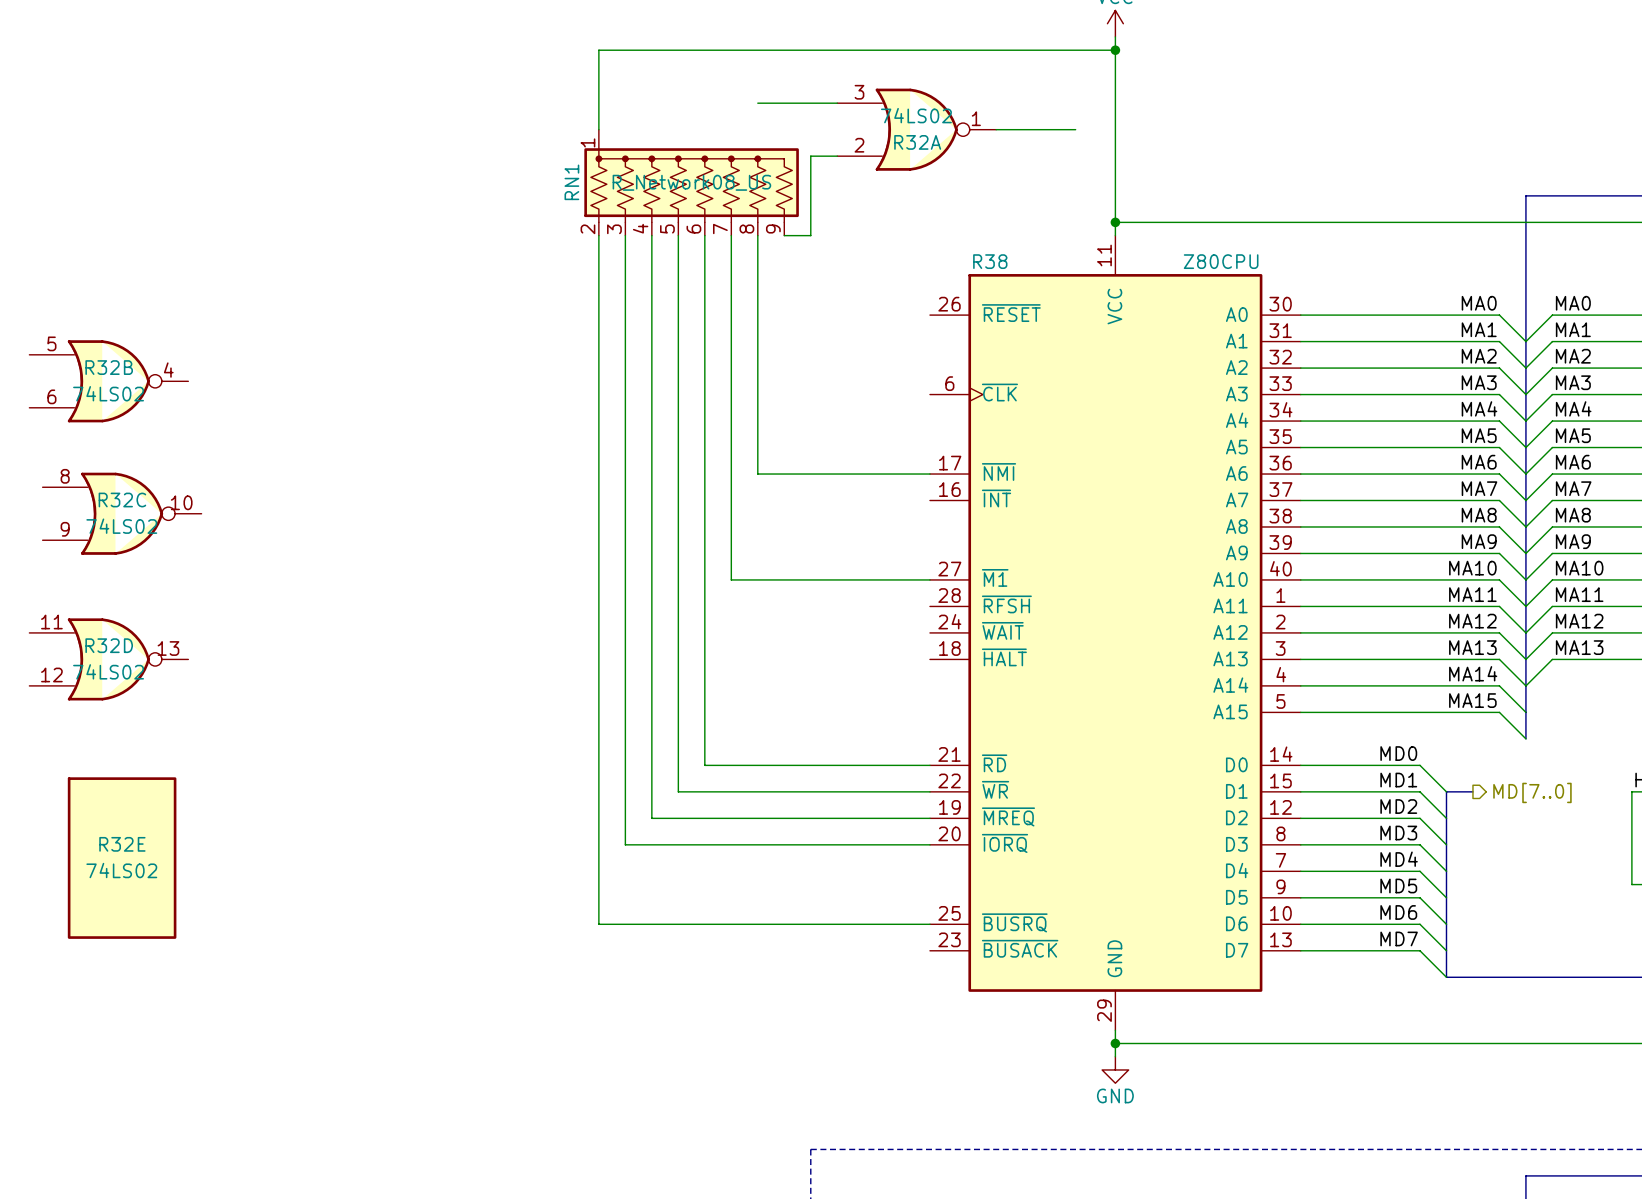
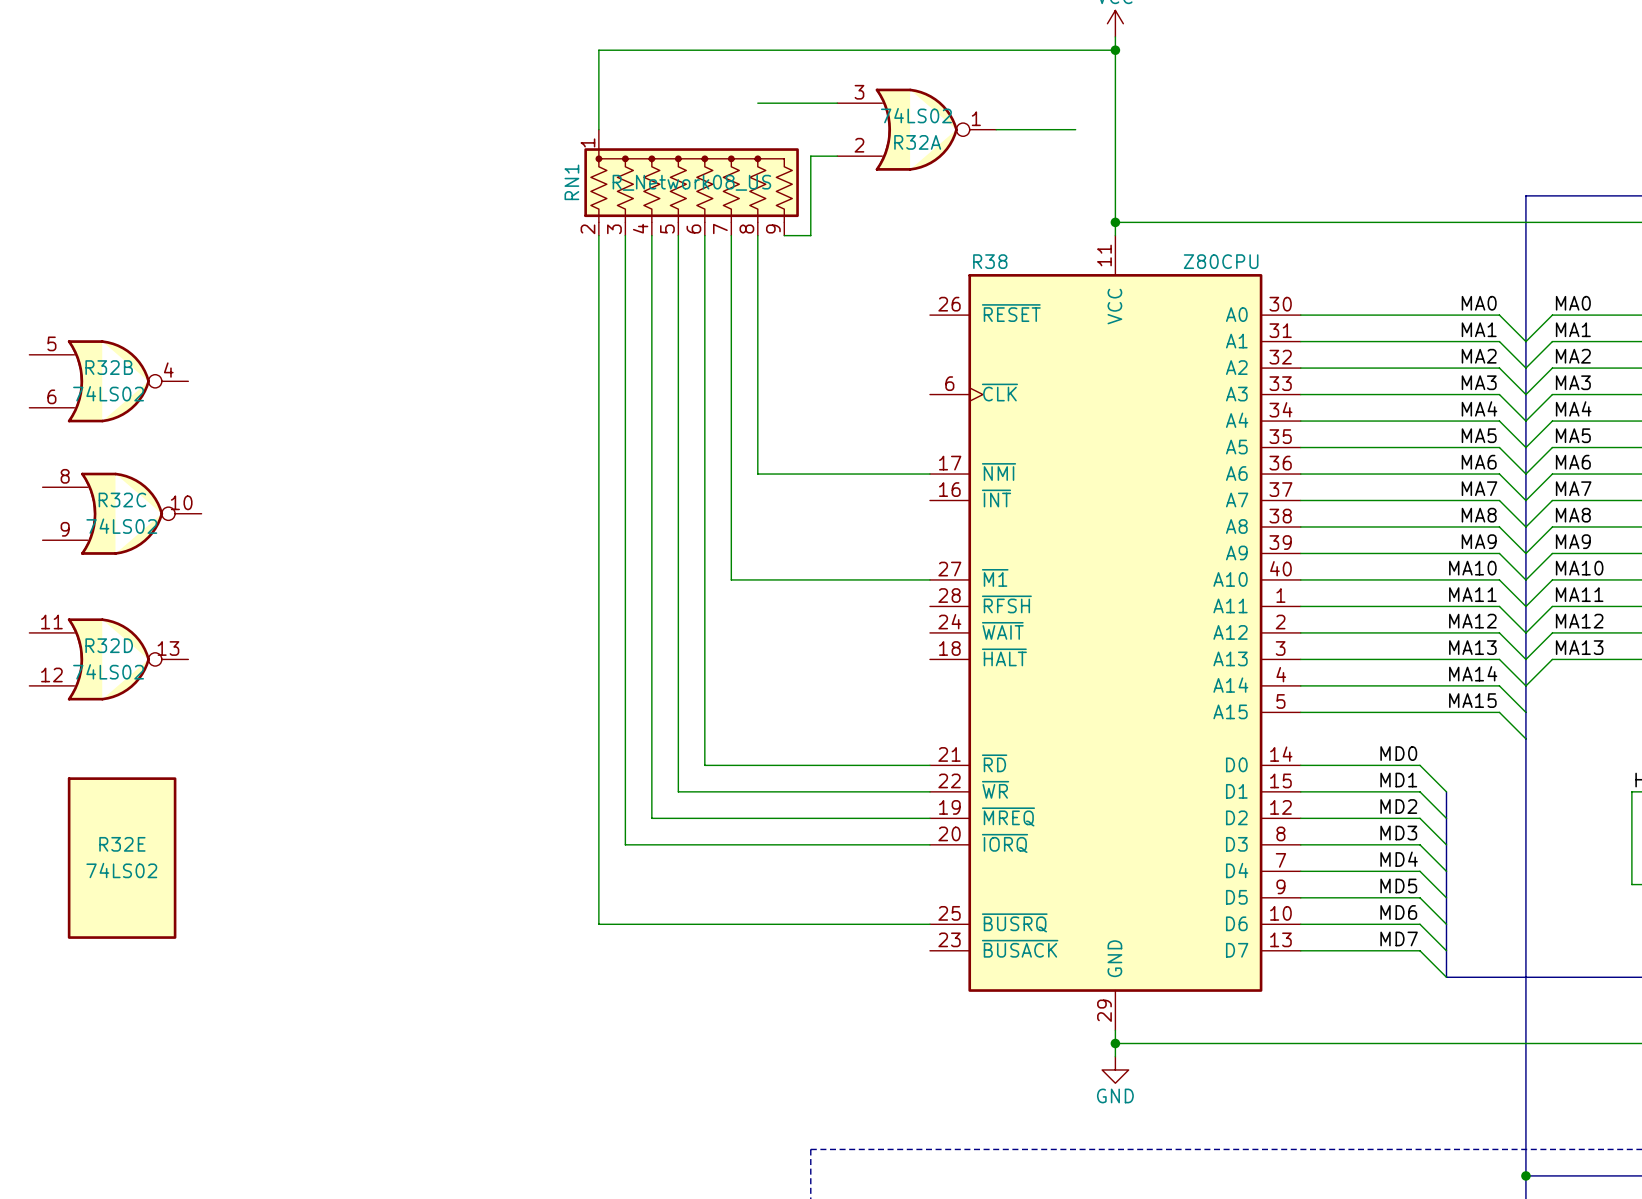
bus: none -> (1525, 738) (1525, 1175)
bus: (1446, 791) (1472, 791) -> none
hierarchical label: MD[7..0] (1532, 792) -> none
junction: none -> (1525, 1175)

